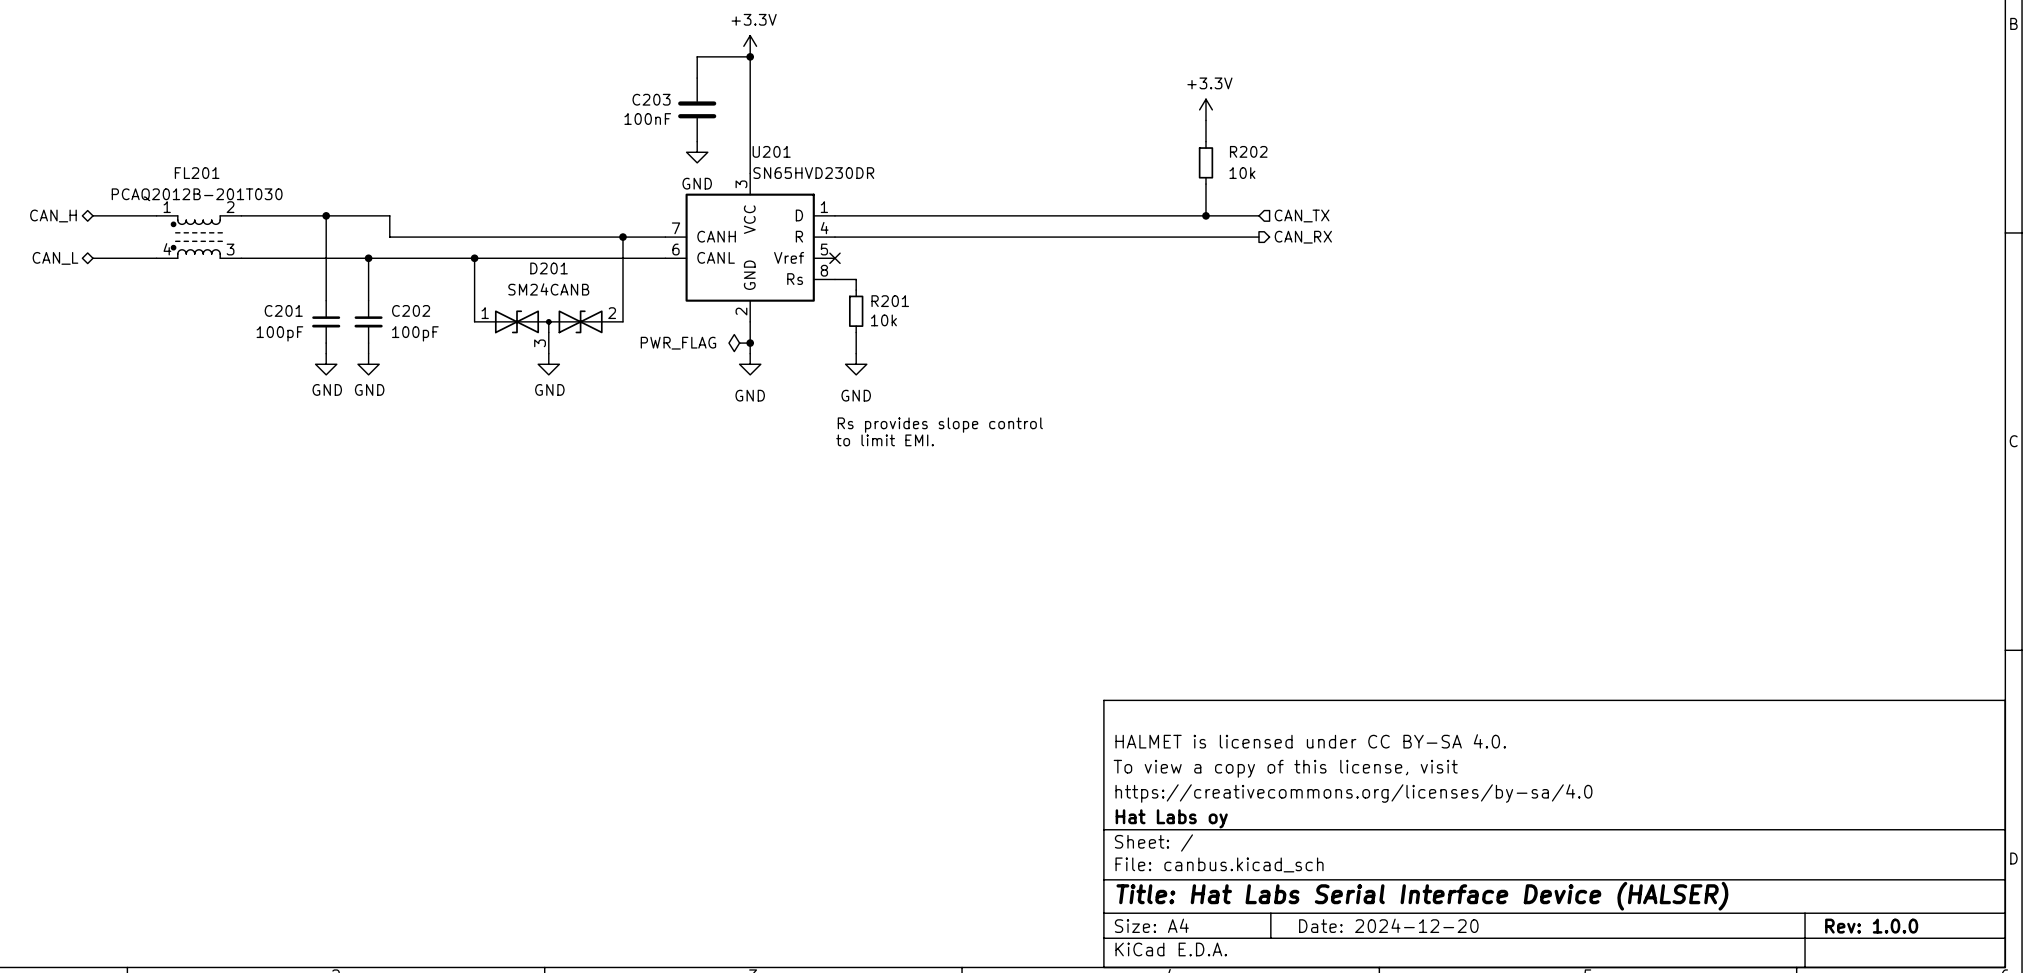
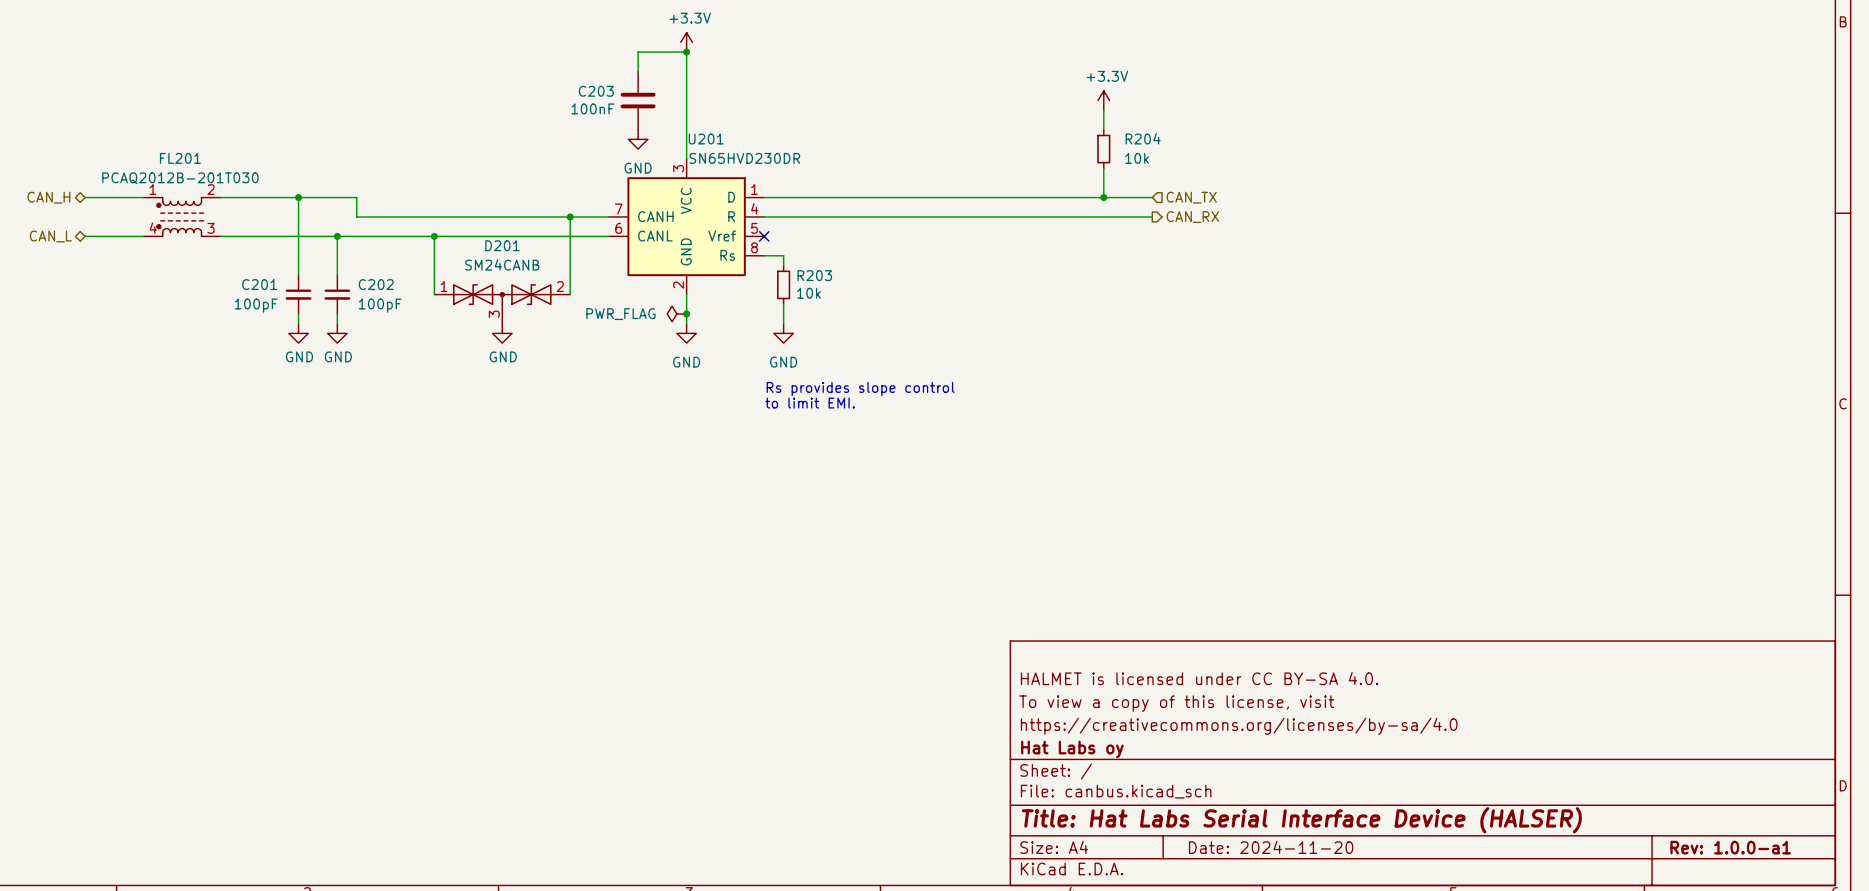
R202 name: R202 (1248, 151) -> R204 (1143, 138)
R201 name: R201 (890, 301) -> R203 (814, 275)
title block: Date: 2024-12-20 (1388, 925) -> Date: 2024-11-20 (1271, 847)
title block: Rev: 1.0.0 (1871, 926) -> Rev: 1.0.0-a1 (1730, 847)

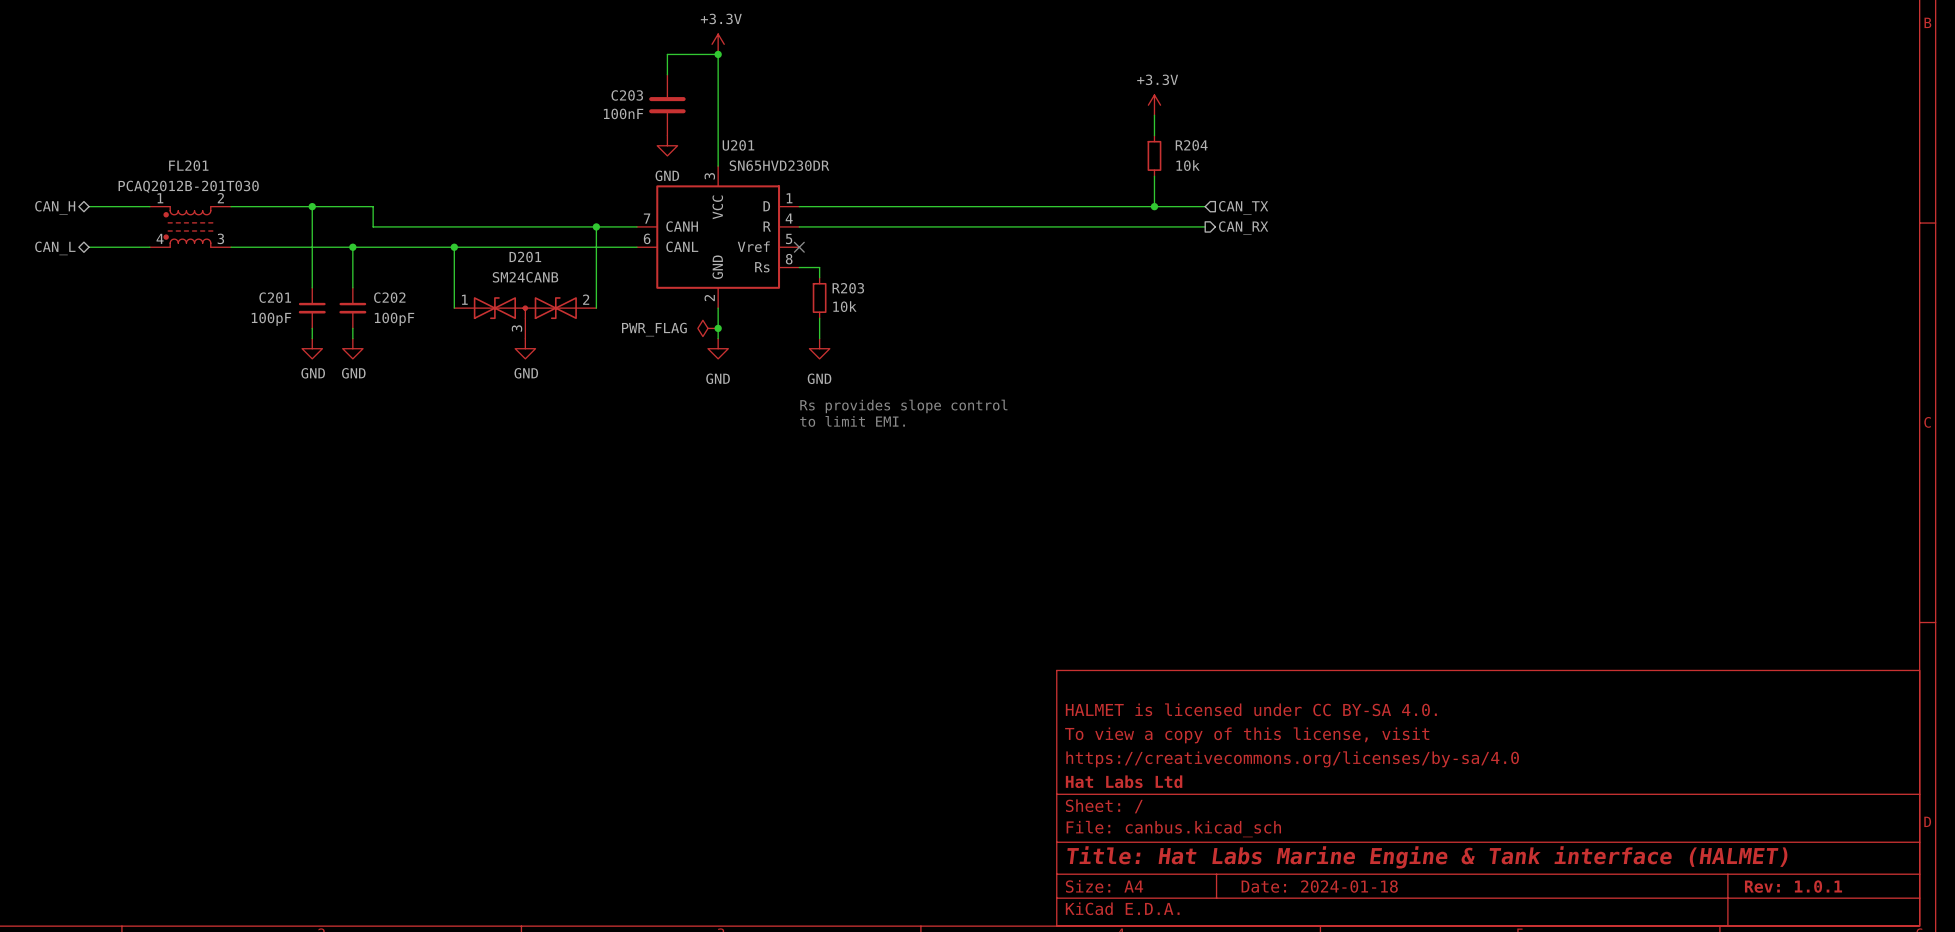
title block: Hat Labs oy (1072, 749) -> Hat Labs Ltd (1124, 781)
title block: Title: Hat Labs Serial Interface Device (HALSER) (1301, 820) -> Title: Hat Labs Marine Engine & Tank interface (HALMET) (1427, 857)
title block: Date: 2024-11-20 (1271, 847) -> Date: 2024-01-18 (1319, 886)
title block: Rev: 1.0.0-a1 (1730, 847) -> Rev: 1.0.1 (1793, 886)

